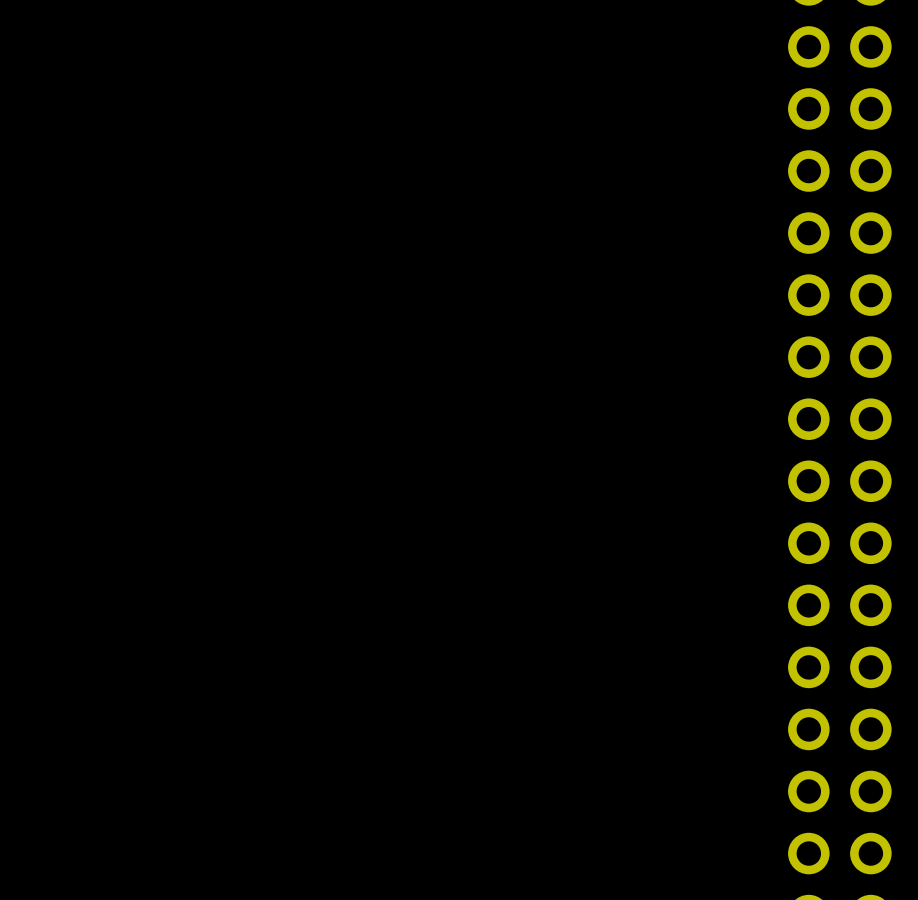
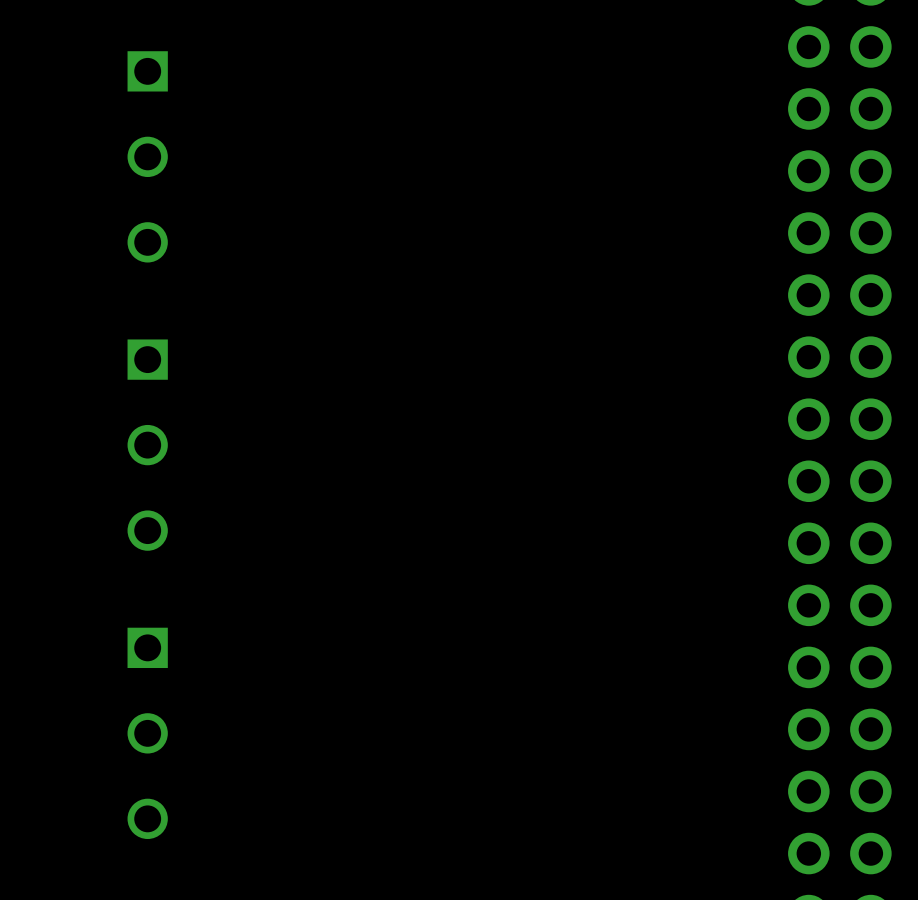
part: none -> (147, 156)
part: none -> (147, 445)
part: none -> (147, 733)

